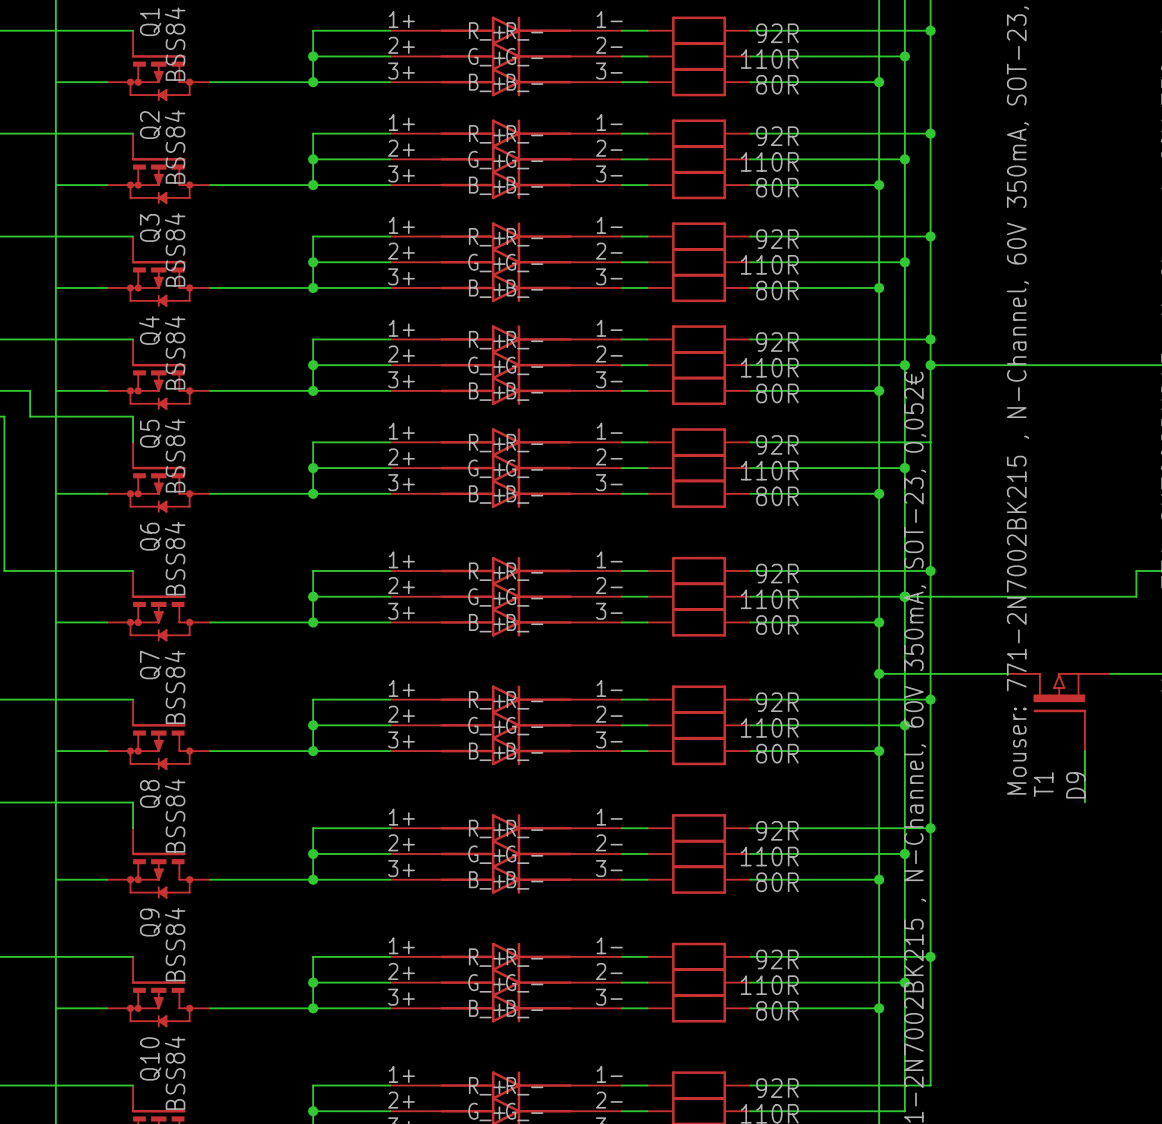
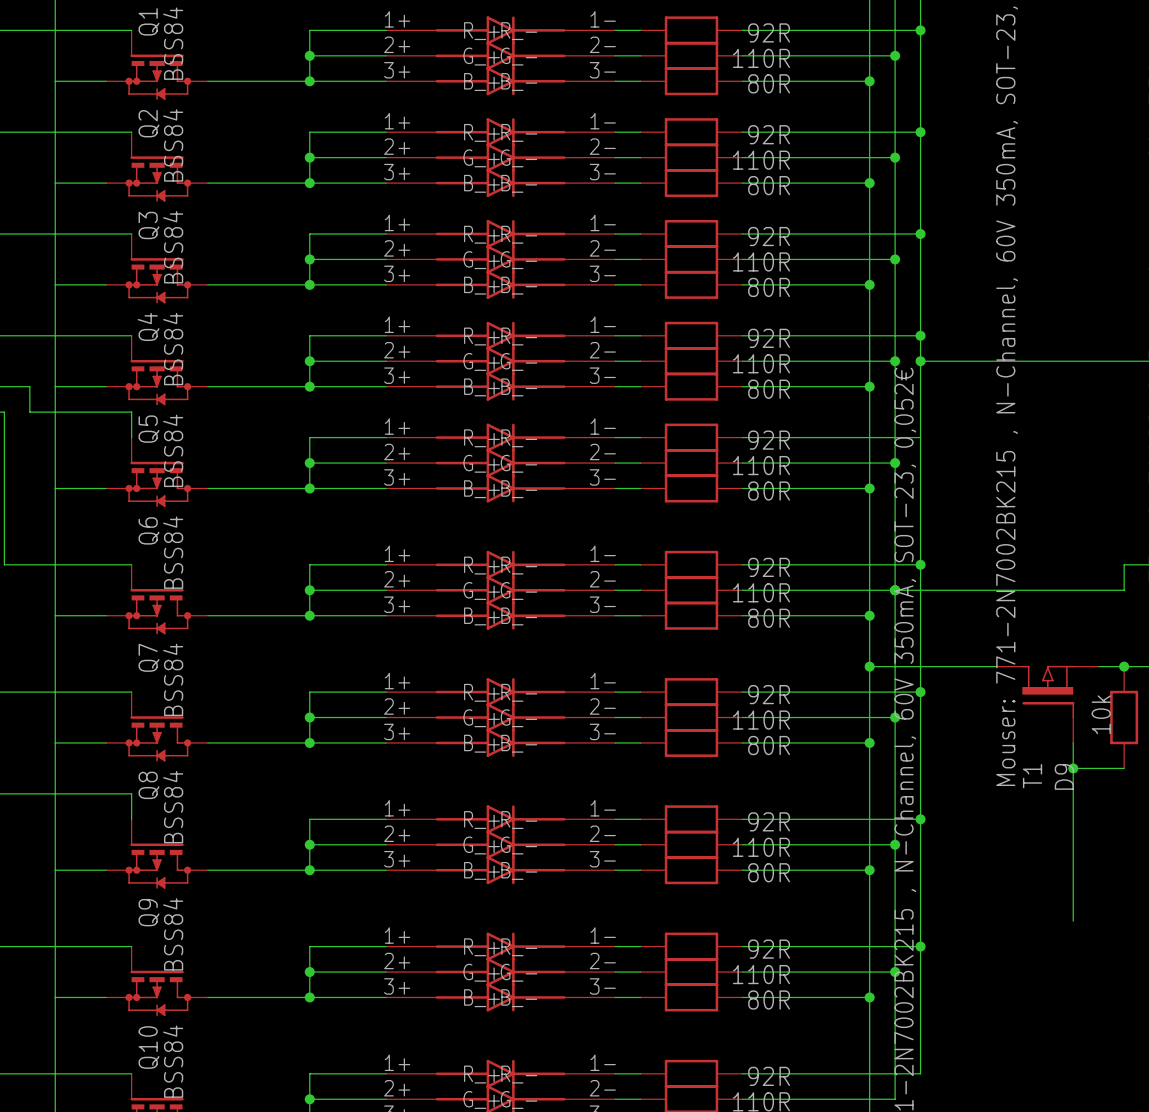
junction: none -> (1124, 666)
part: none -> 10k (1124, 717)
wire: none -> (1073, 768) (1124, 768)
junction: none -> (1073, 768)
wire: none -> (1073, 793) (1073, 921)

